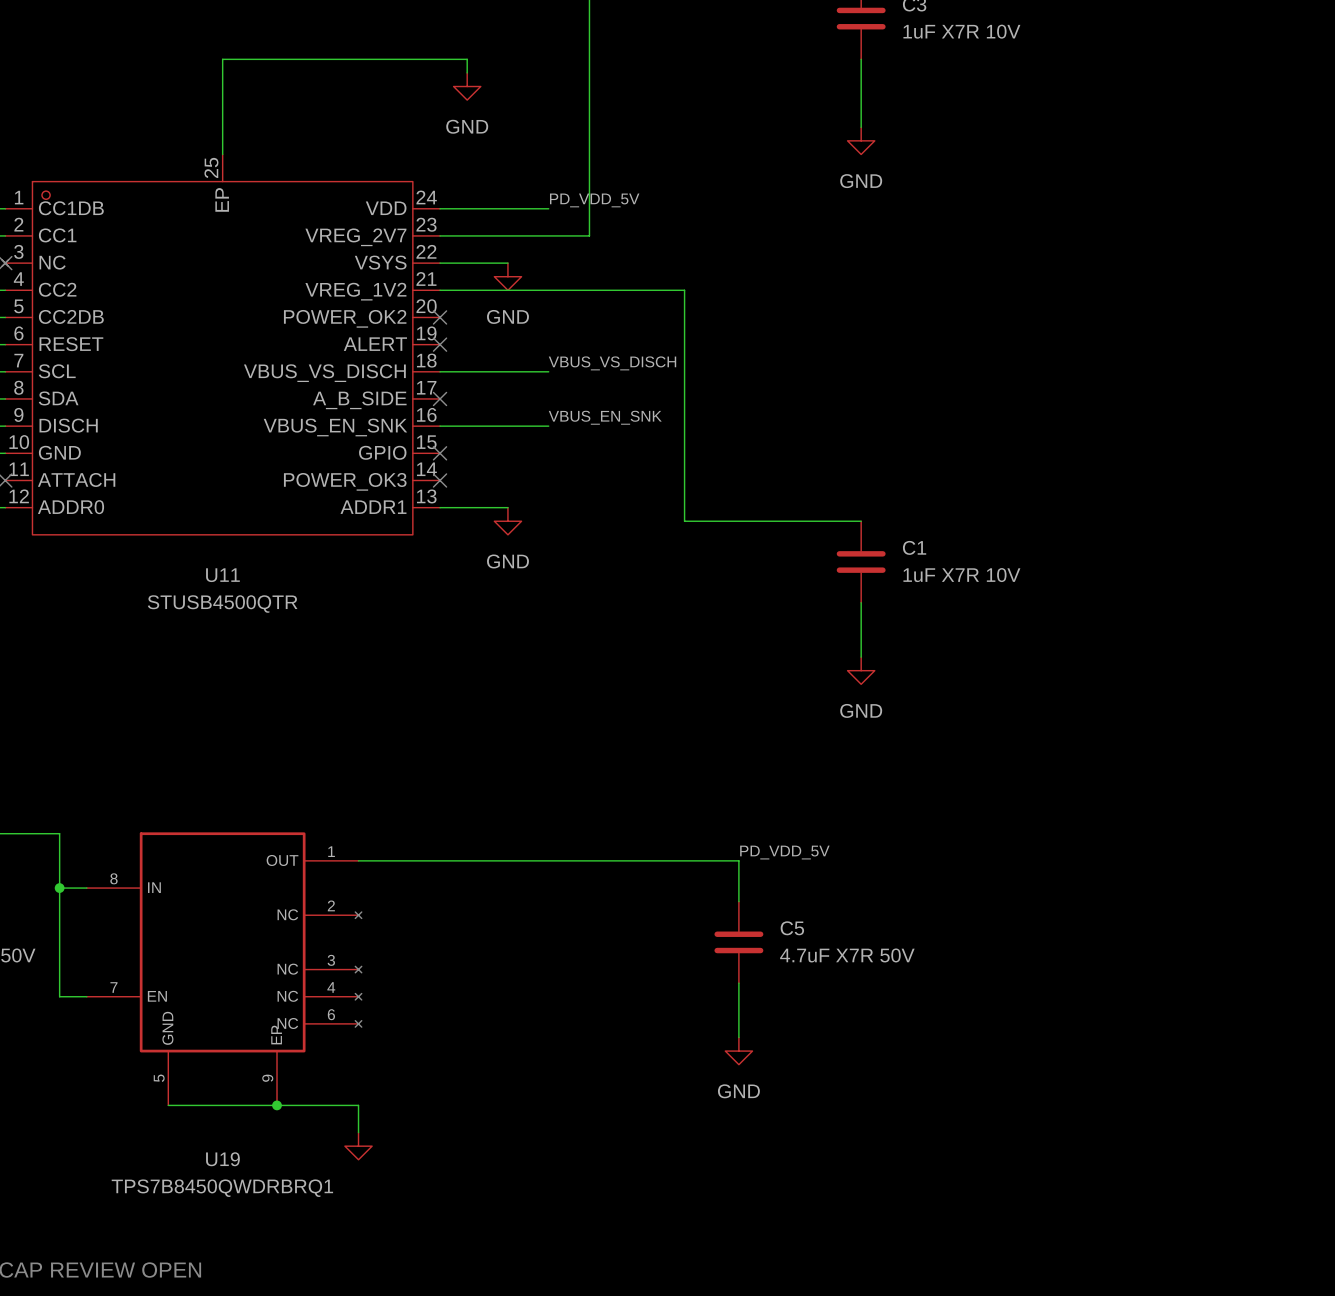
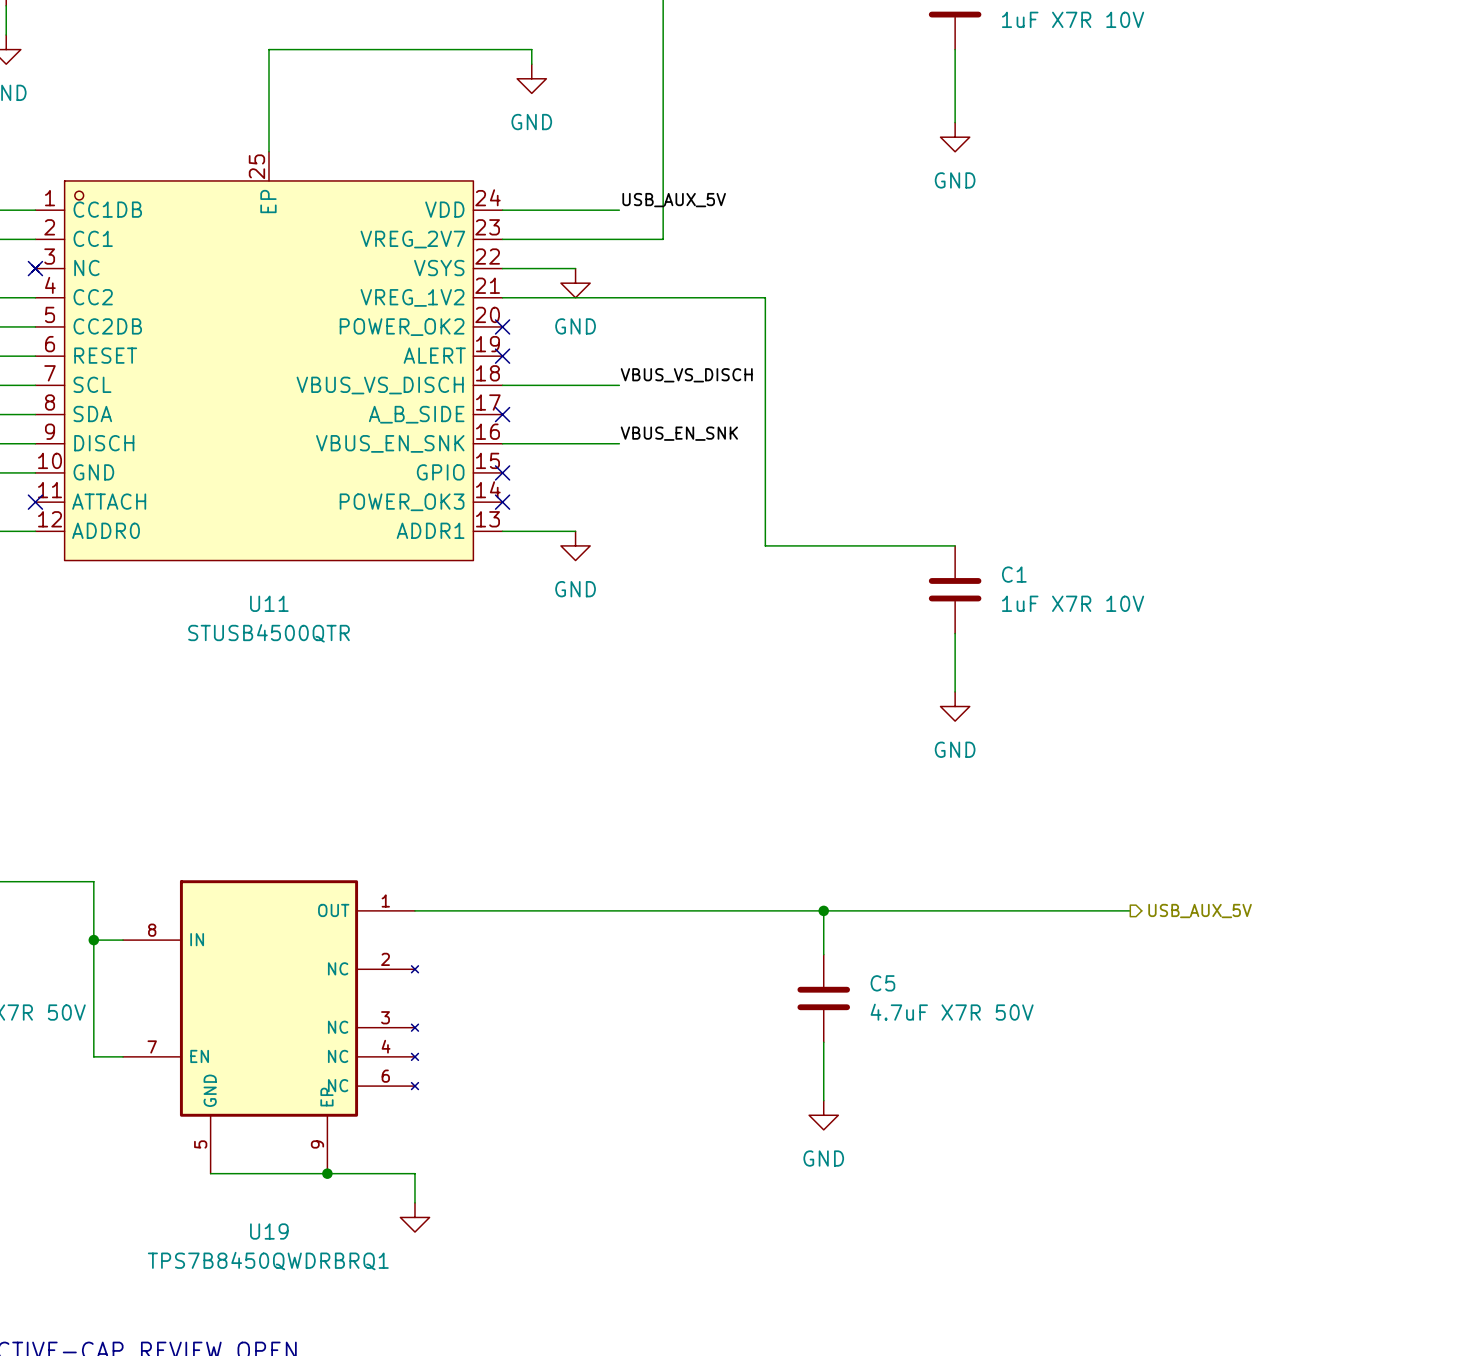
label: PD_VDD_5V (594, 200) -> USB_AUX_5V (674, 200)
label: PD_VDD_5V (784, 852) -> none
wire: none -> (823, 910) (1130, 910)
junction: none -> (823, 910)
hierarchical label: none -> USB_AUX_5V (1200, 911)

